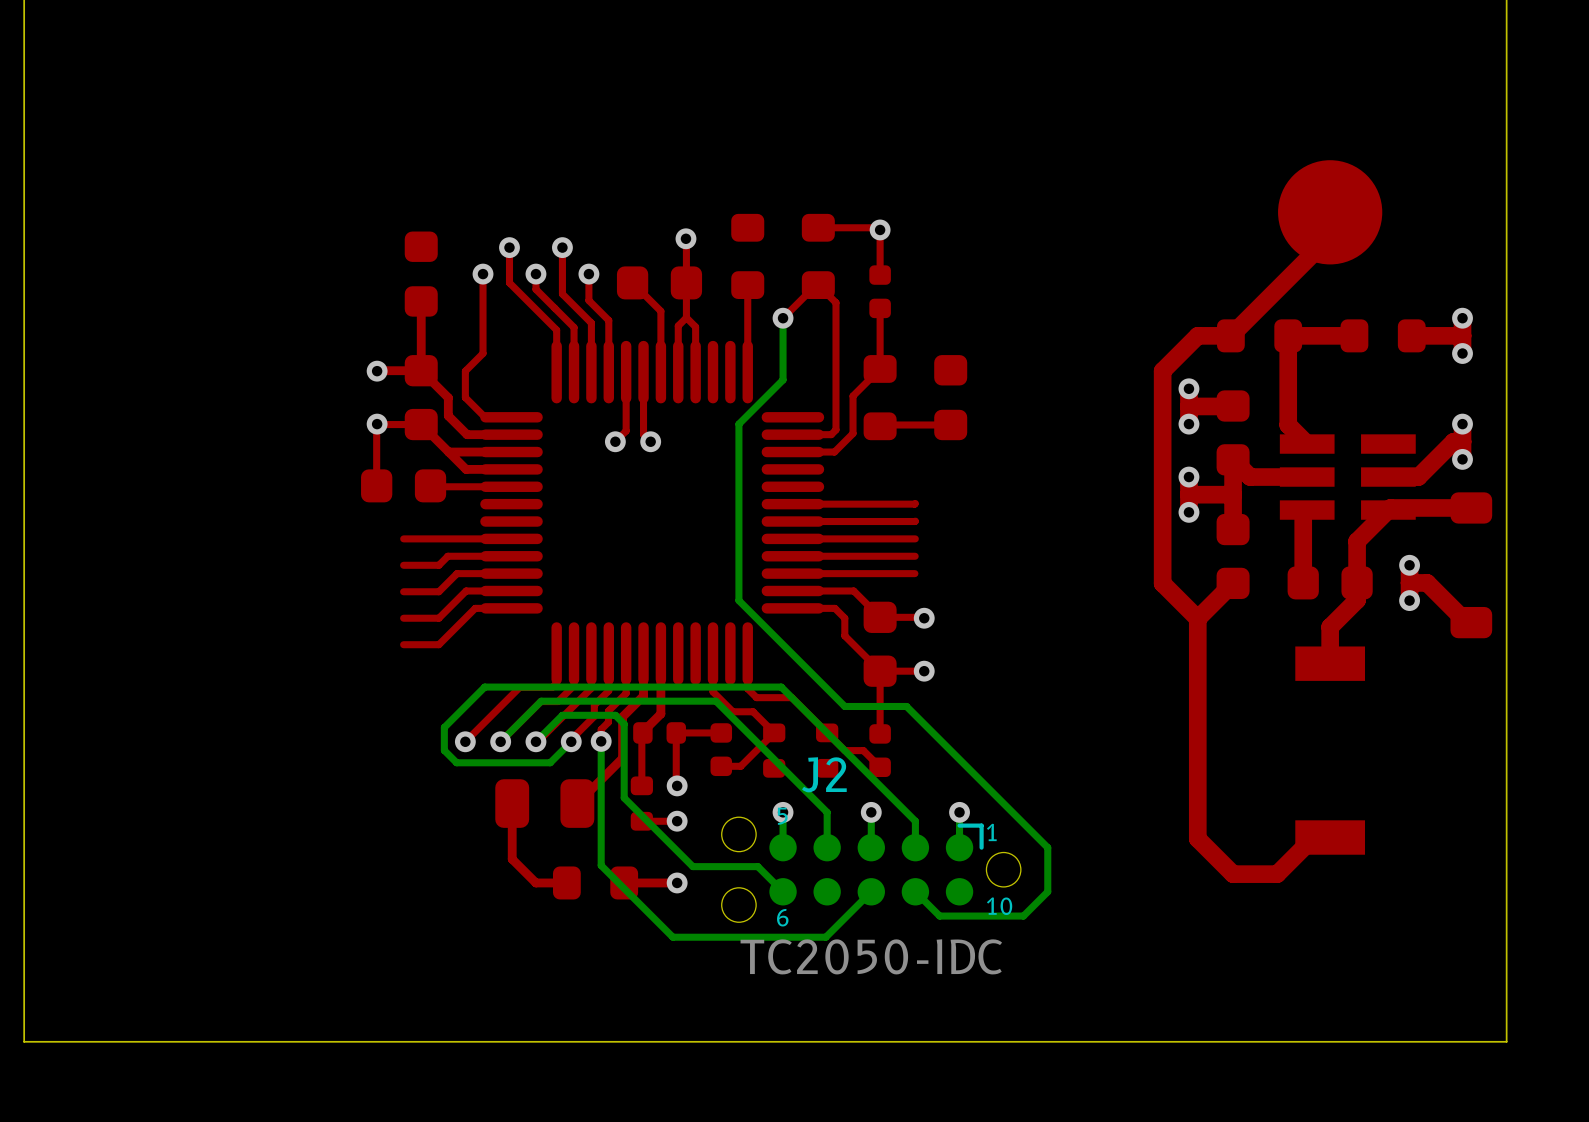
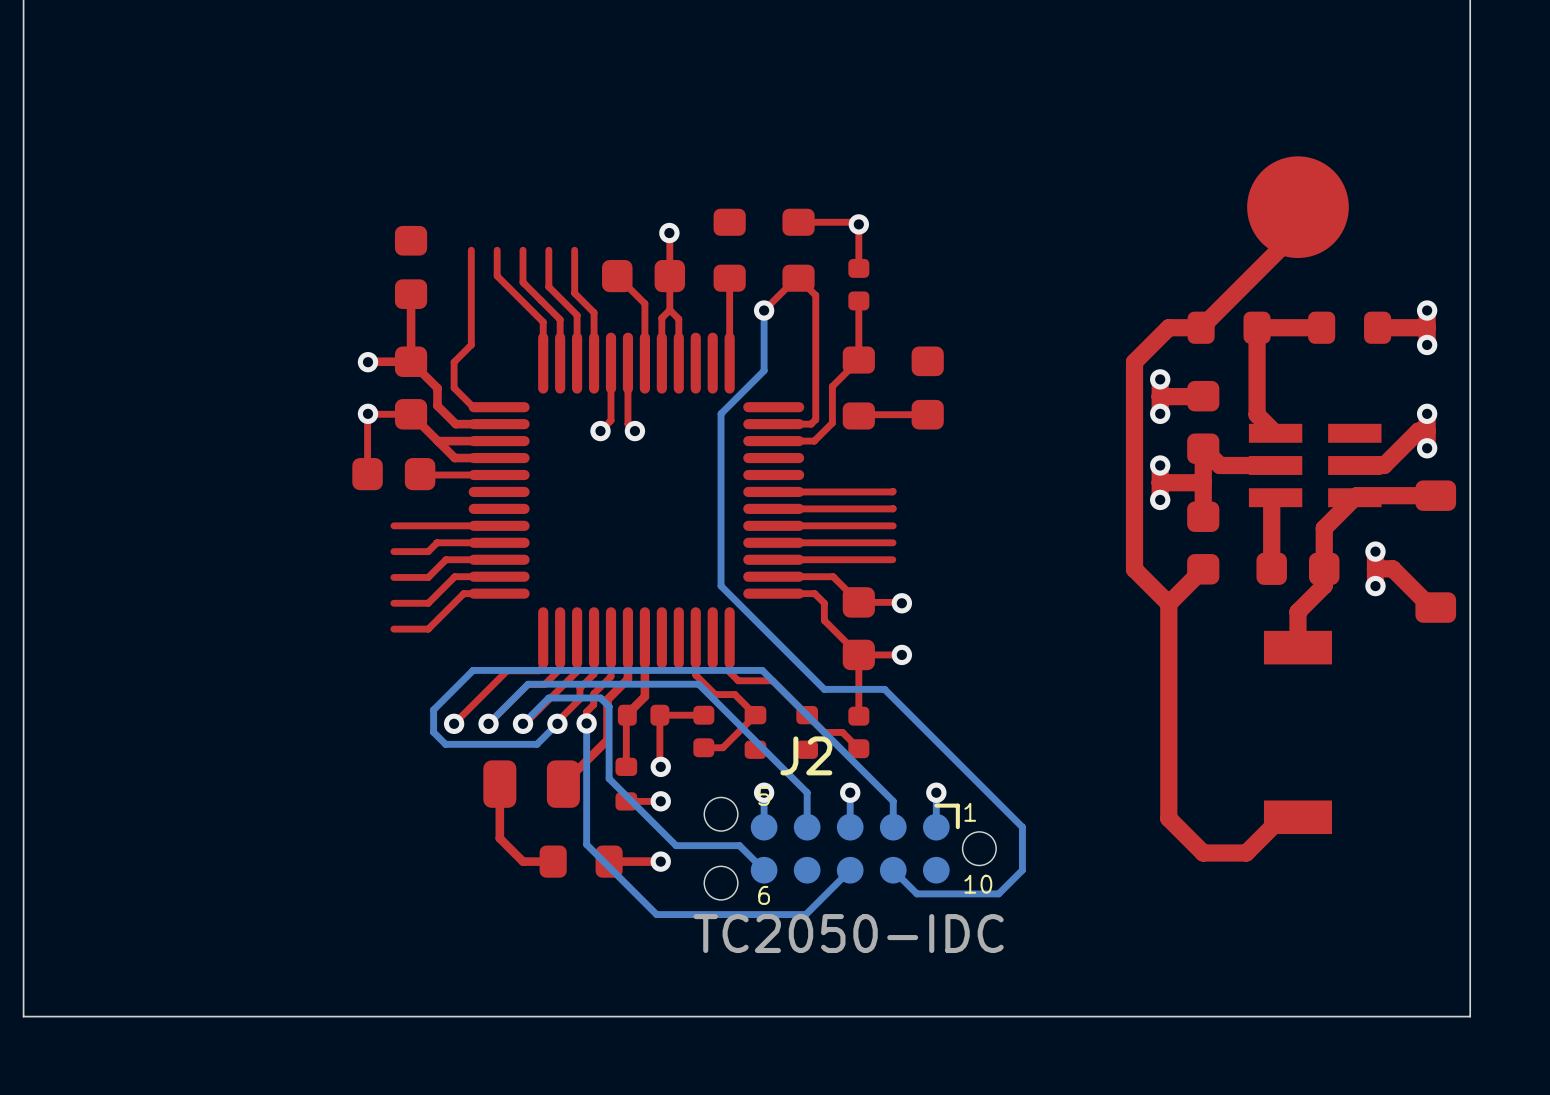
via: (509, 247) -> none
via: (562, 247) -> none
top track: none -> (471, 250) (471, 267)
top track: none -> (523, 250) (523, 267)
top track: none -> (574, 250) (574, 267)
via: (483, 274) -> none
via: (535, 274) -> none
via: (588, 274) -> none

